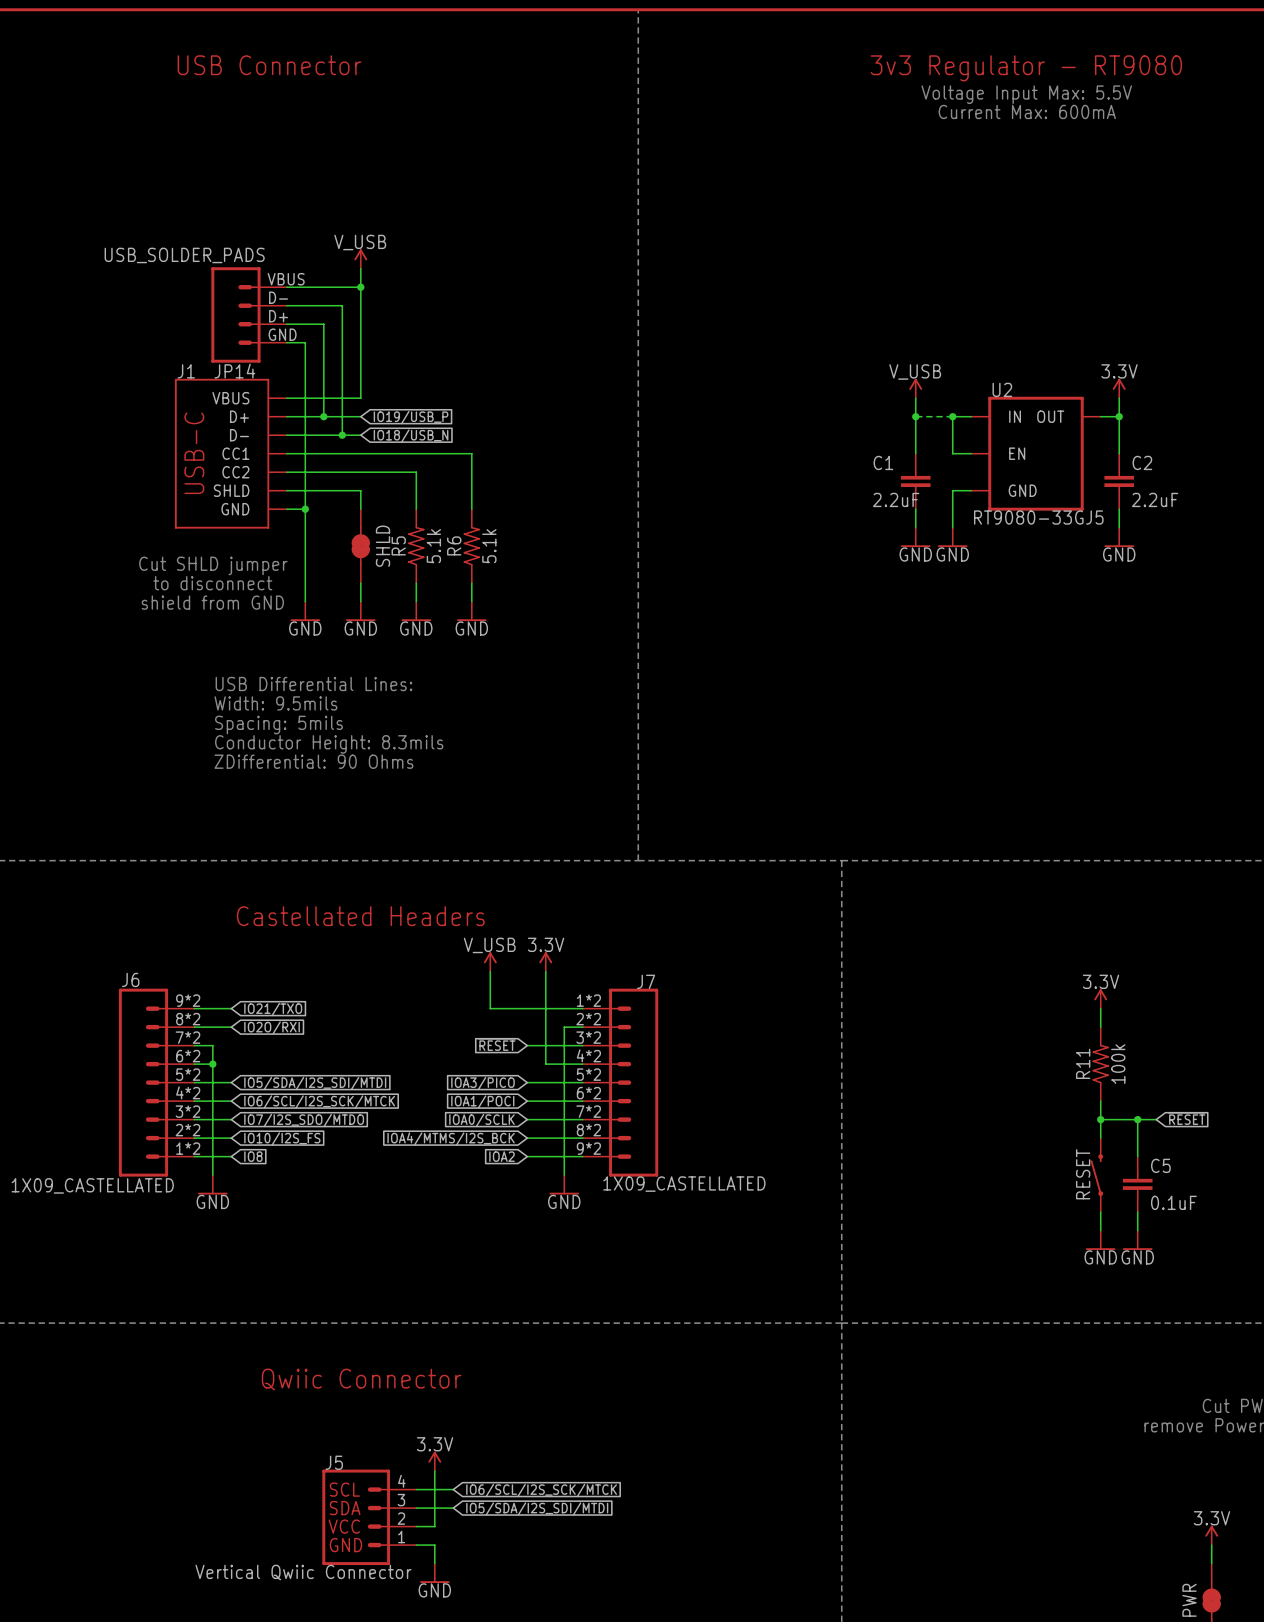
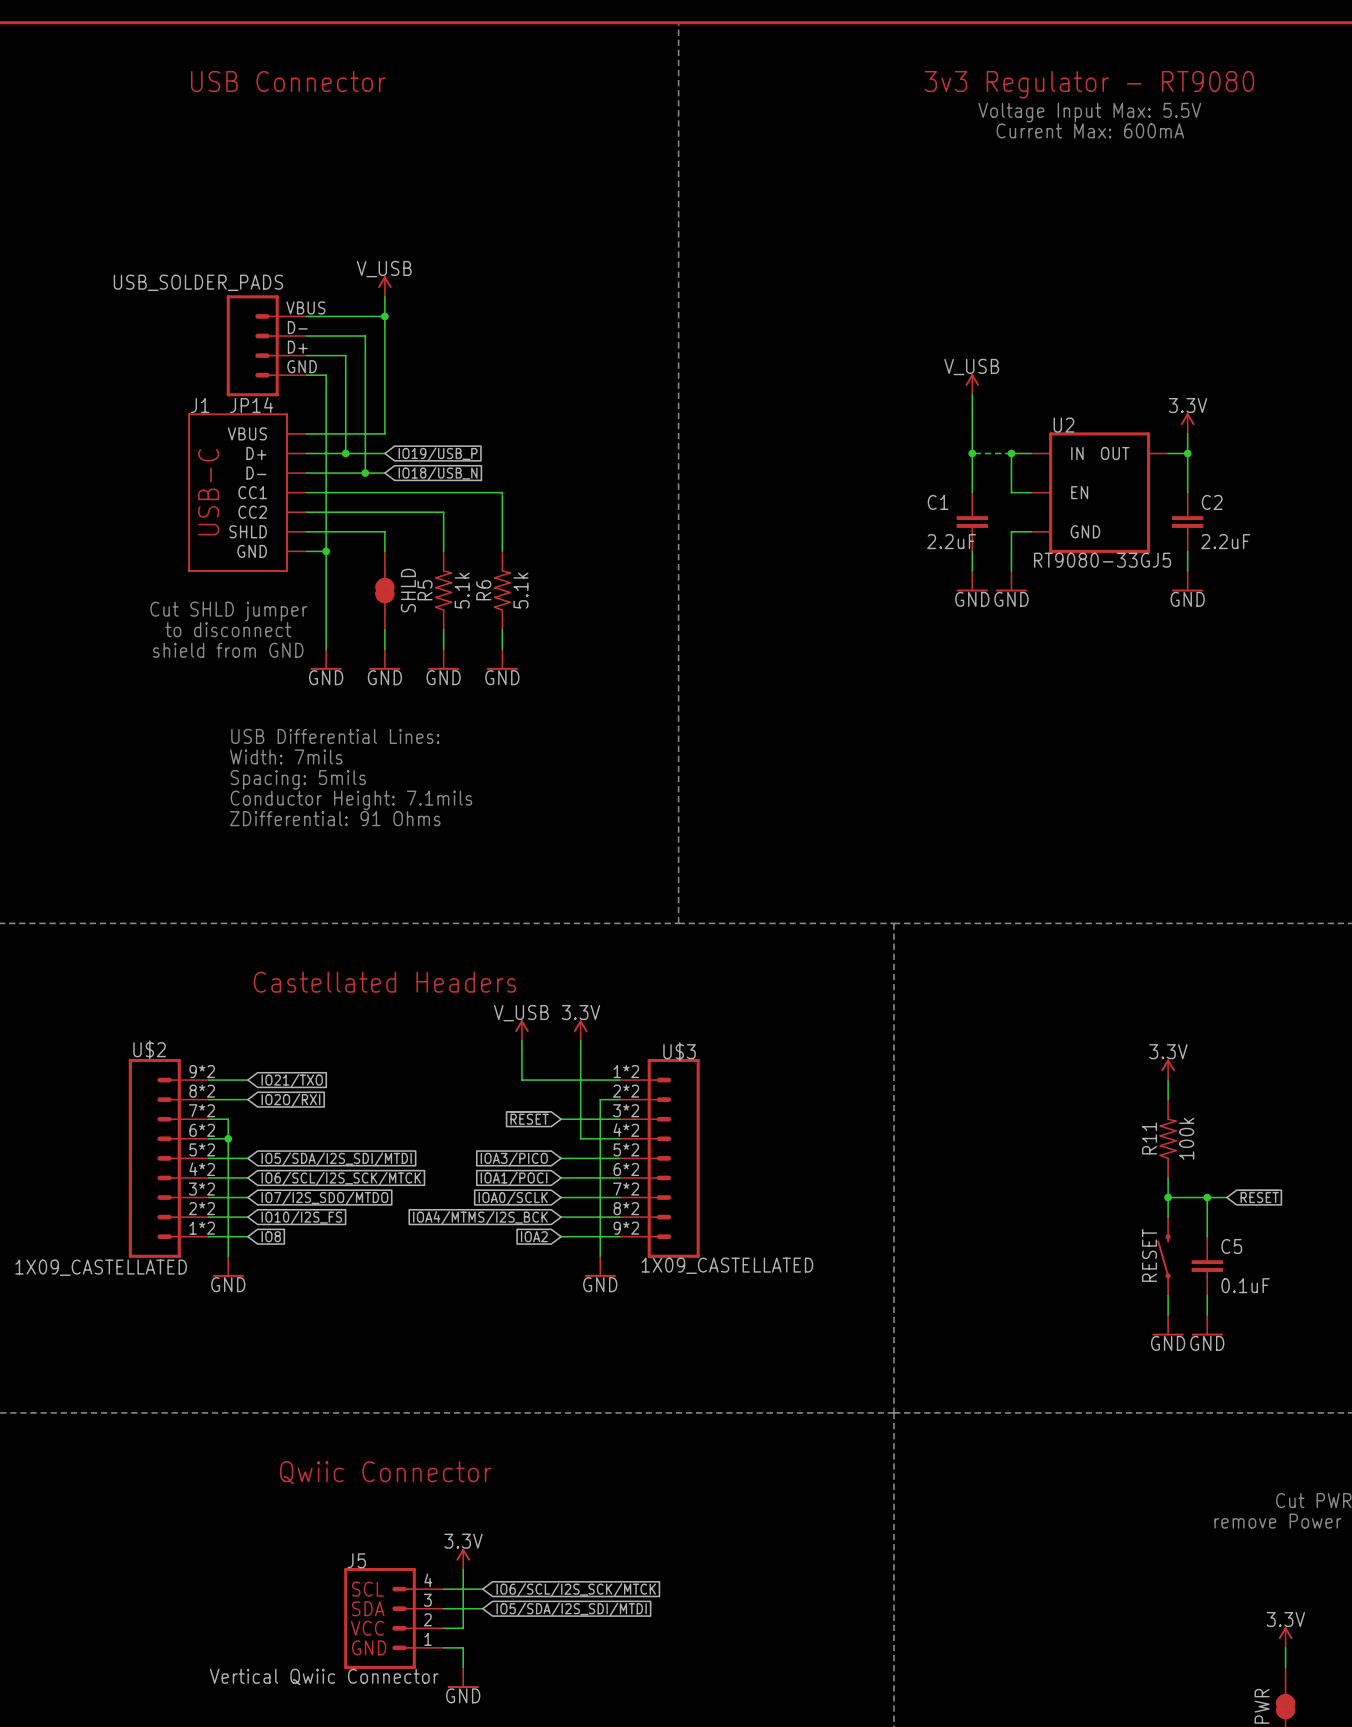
power symbol position: V_USB (915, 388) -> V_USB (972, 384)
text: Width: 9.5mils (275, 703) -> Width: 7mils (286, 756)
text: Conductor Height: 8.3mils (329, 744) -> Conductor Height: 7.1mils (351, 800)
text: ZDifferential: 90 Ohms (313, 761) -> ZDifferential: 91 Ohms (335, 818)
J6 name: J6 (130, 979) -> U$2 (149, 1049)
J7 name: J7 (646, 981) -> U$3 (679, 1051)

